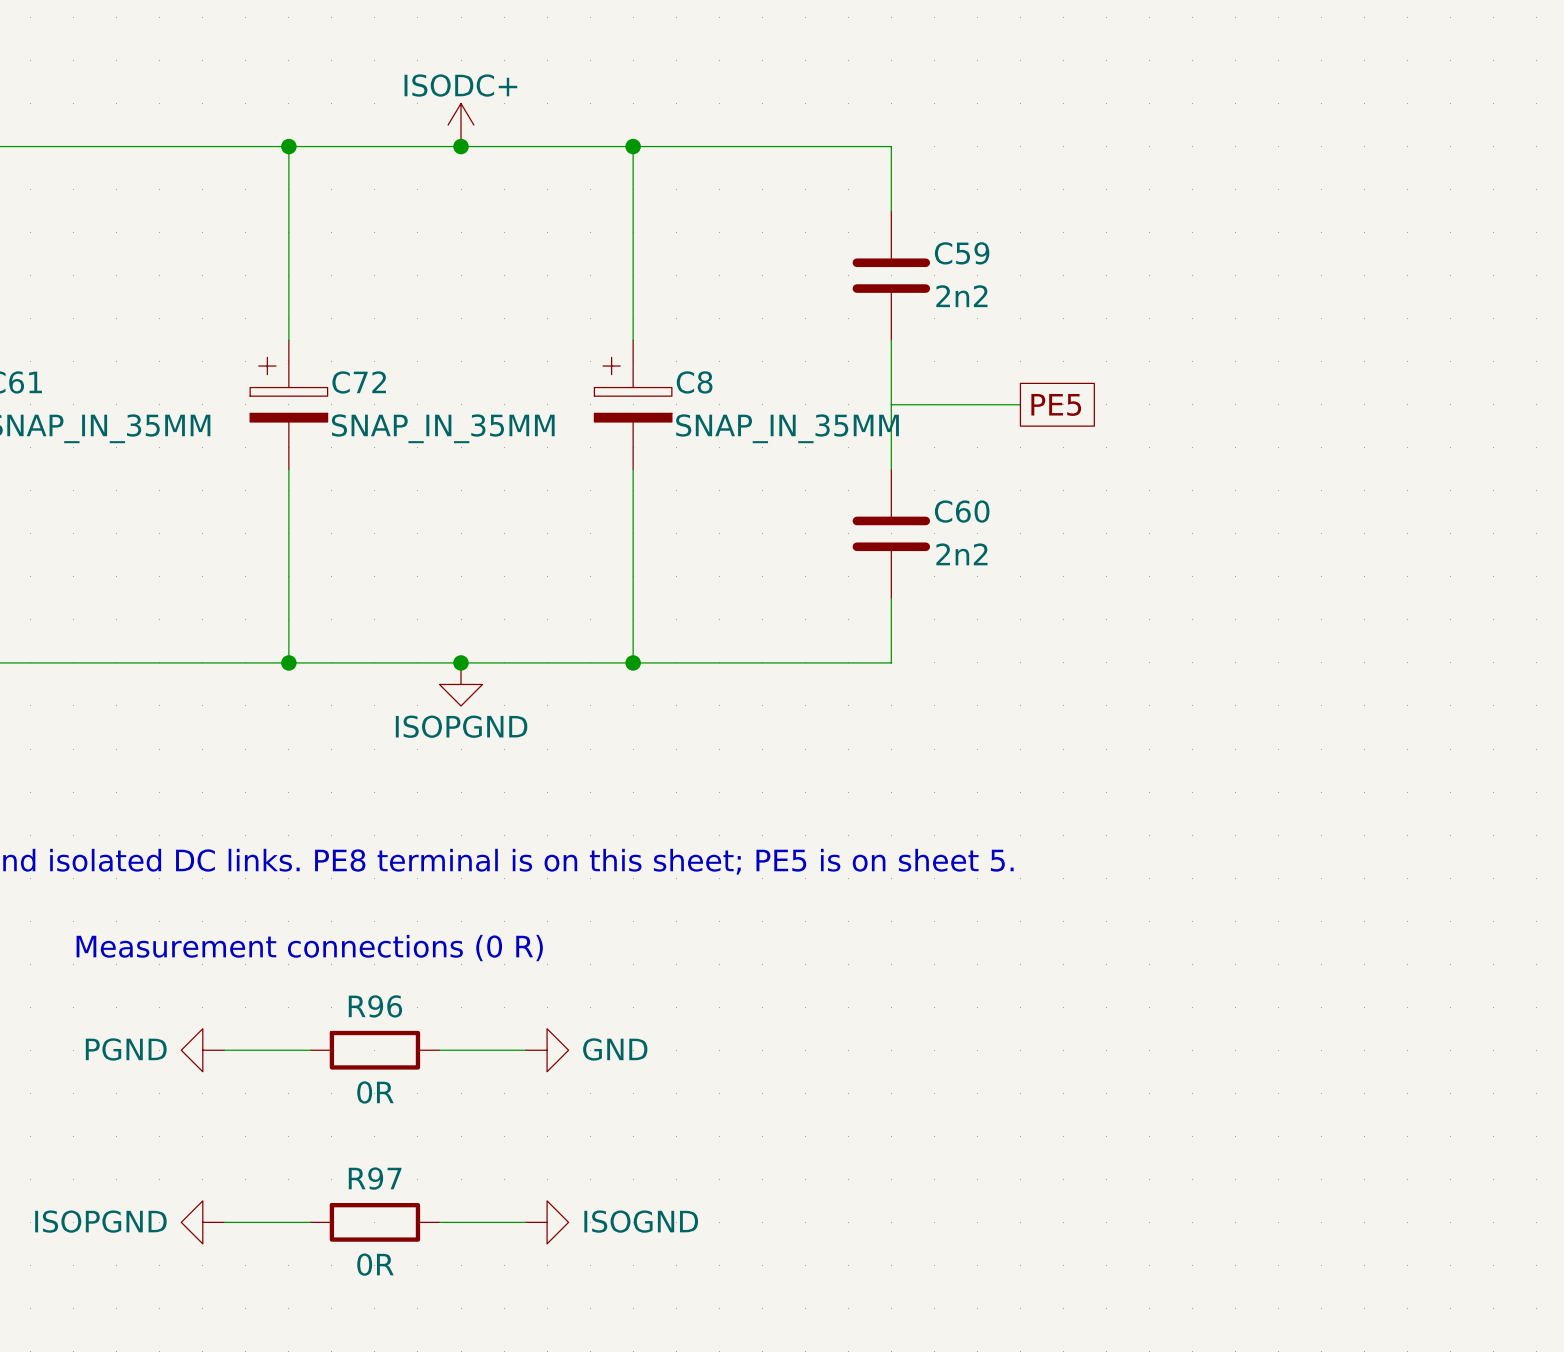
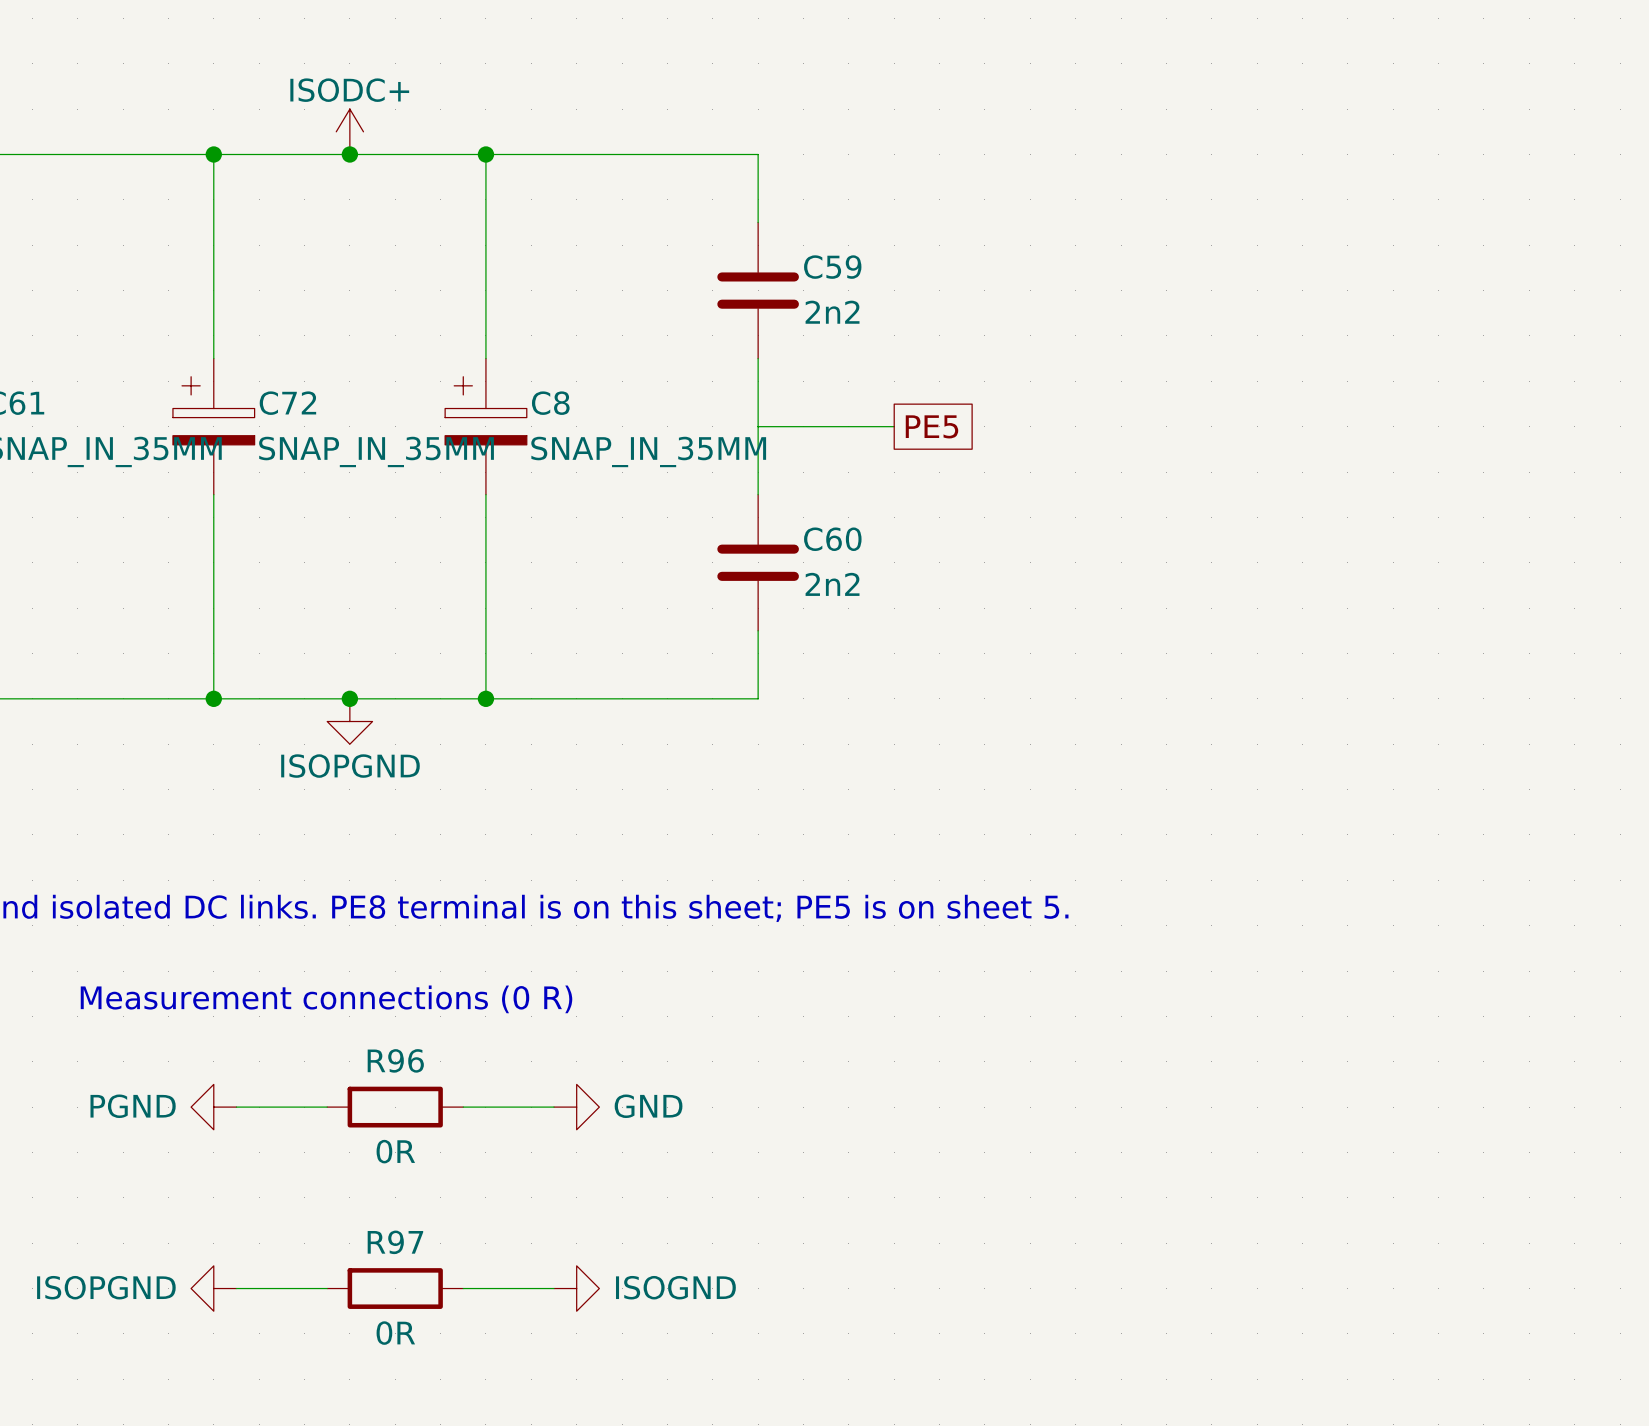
power symbol position: ISODC+ (461, 125) -> ISODC+ (349, 131)
junction: none -> (213, 154)
wire: (288, 146) (288, 340) -> (213, 154) (213, 358)
junction: (288, 146) -> none
junction: none -> (349, 154)
wire: (633, 146) (633, 340) -> (485, 154) (485, 358)
junction: (633, 146) -> none
wire: (719, 146) (891, 146) (891, 211) -> (758, 154) (758, 222)
C59 position: (891, 275) -> (758, 290)
wire: (891, 340) (891, 469) -> (758, 358) (758, 494)
C72 position: (288, 404) -> (213, 426)
C8 position: (633, 404) -> (485, 426)
wire: (891, 404) (1020, 404) -> (758, 426) (894, 426)
global label position: PE5 (1056, 404) -> PE5 (931, 426)
wire: (288, 469) (288, 662) -> (213, 494) (213, 698)
wire: (633, 469) (633, 662) -> (485, 494) (485, 698)
C60 position: (891, 533) -> (758, 562)
wire: (891, 598) (891, 662) (719, 662) -> (758, 630) (758, 698)
junction: none -> (213, 698)
junction: (288, 662) -> none
junction: none -> (349, 698)
junction: (633, 662) -> none
power symbol position: ISOPGND (461, 684) -> ISOPGND (349, 721)

